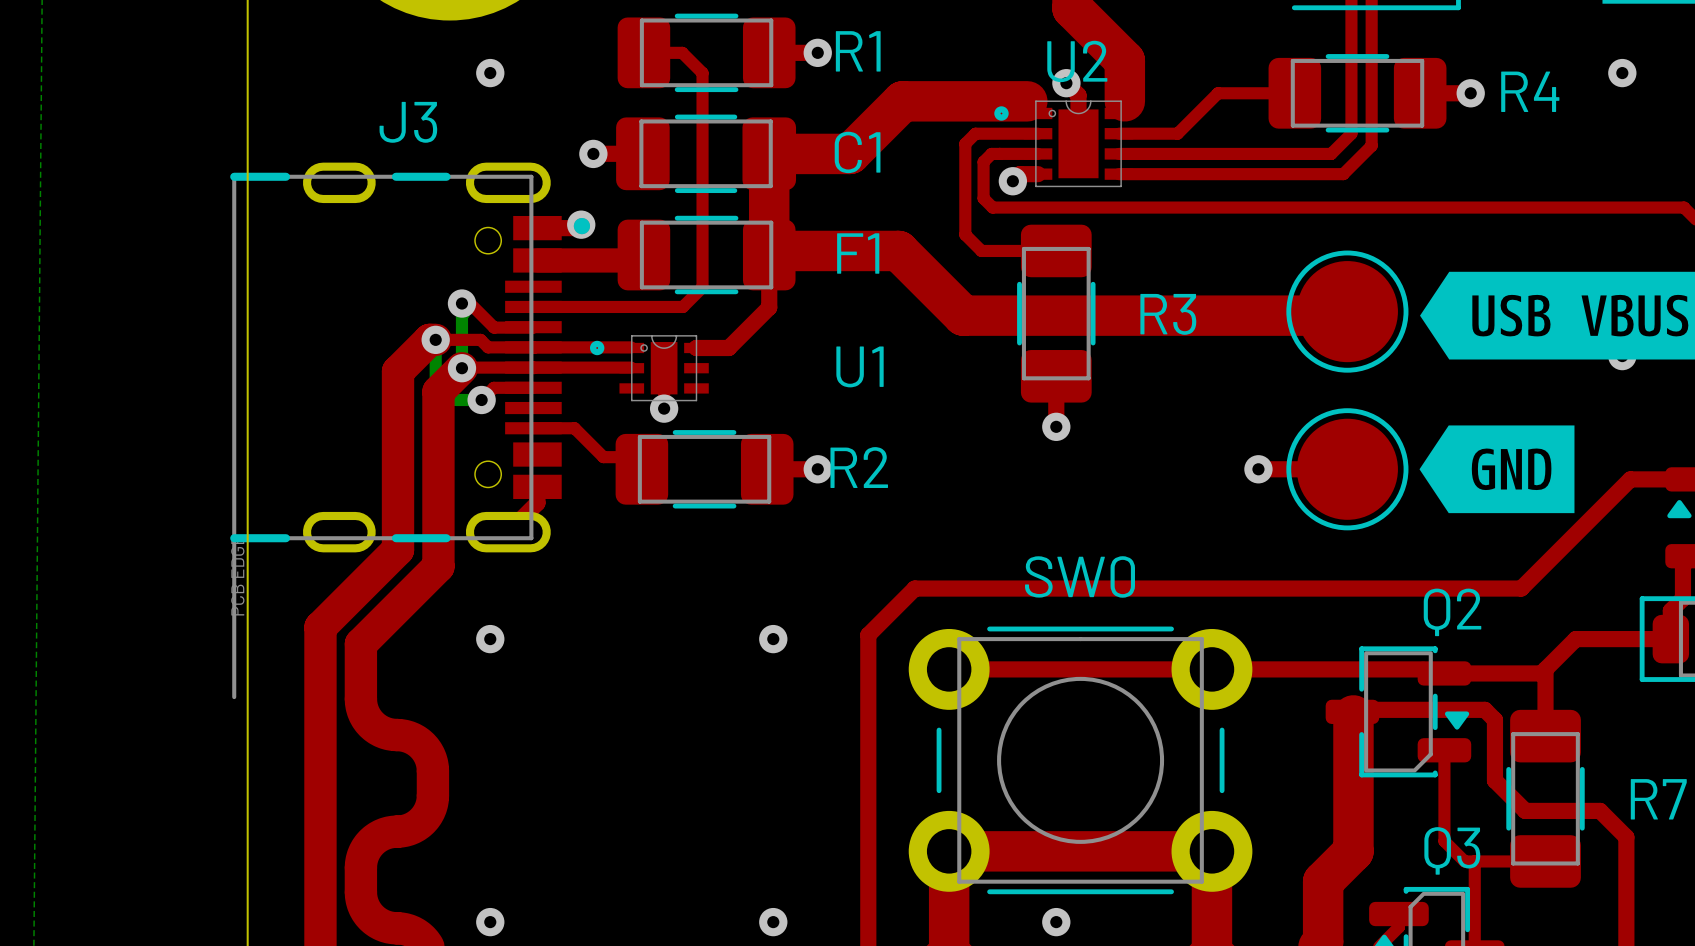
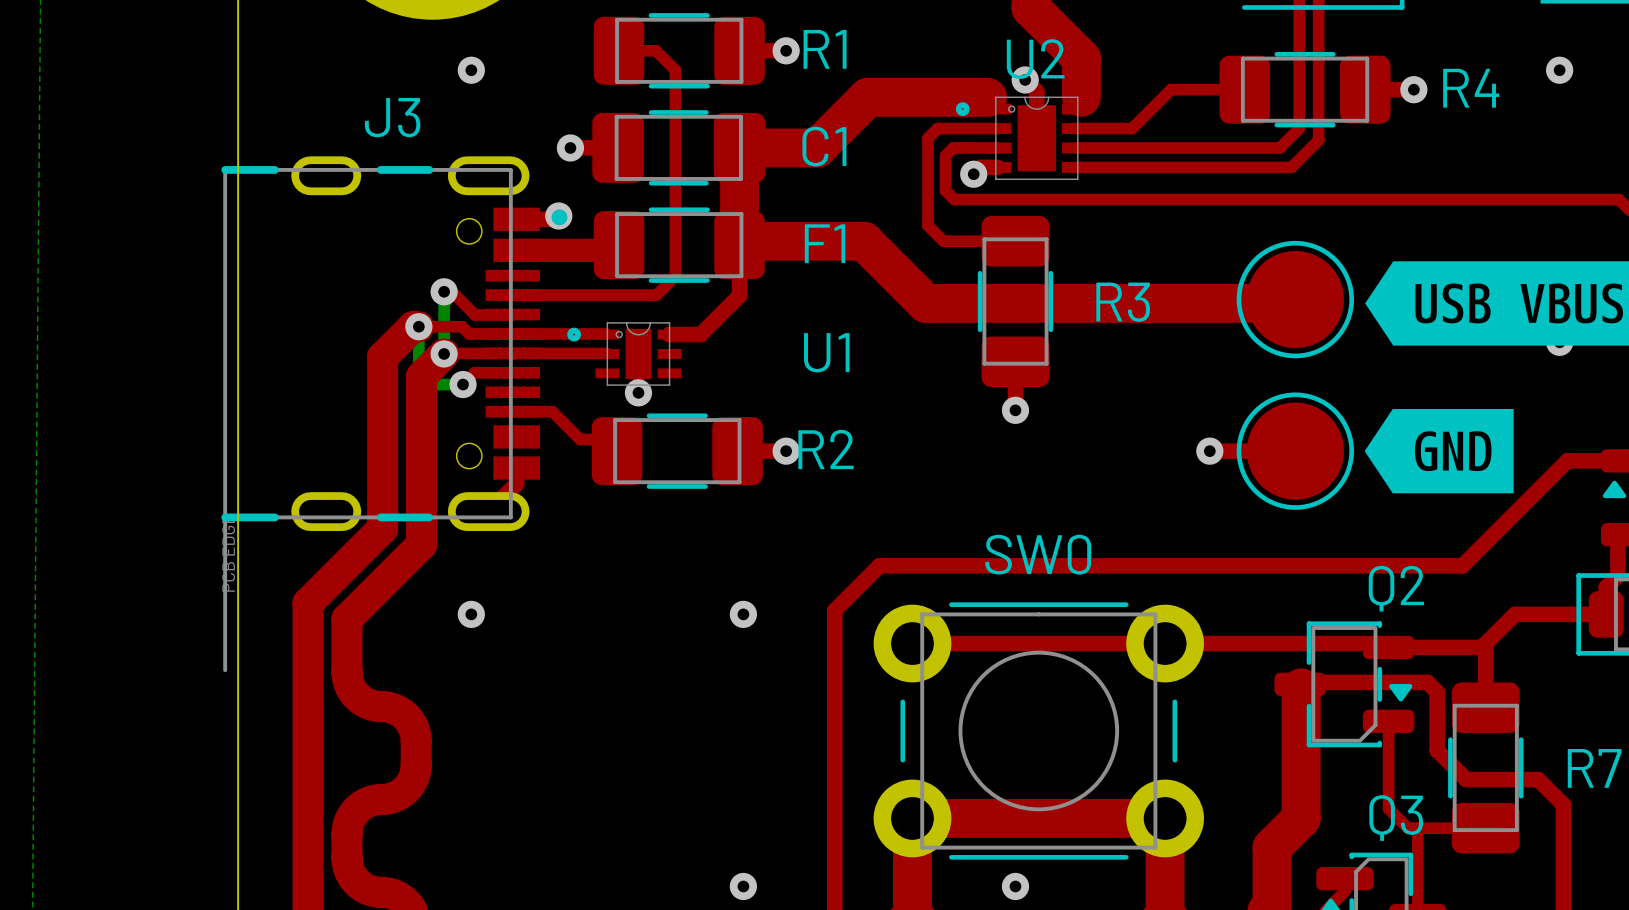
via: (490, 922) -> none

